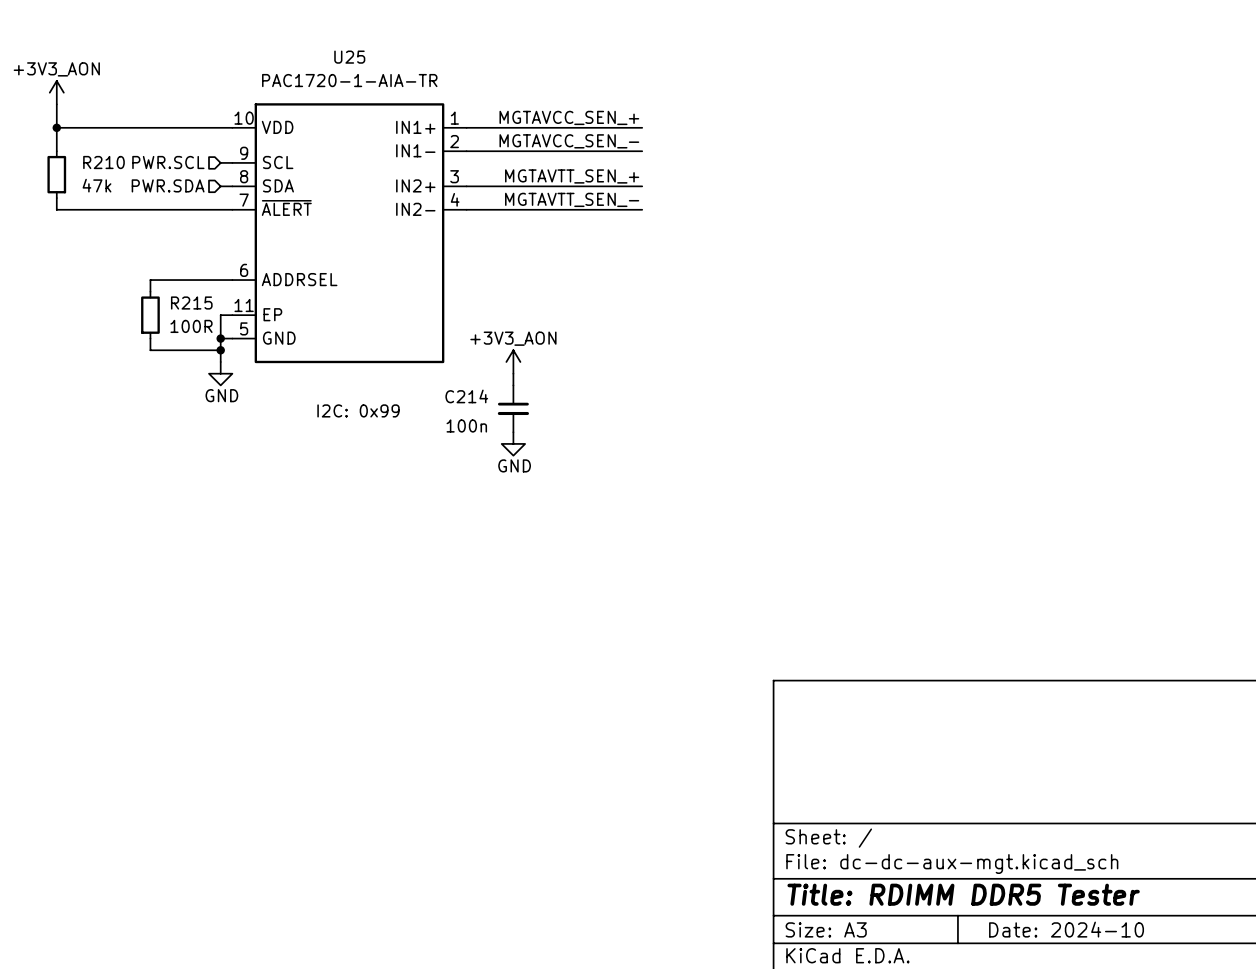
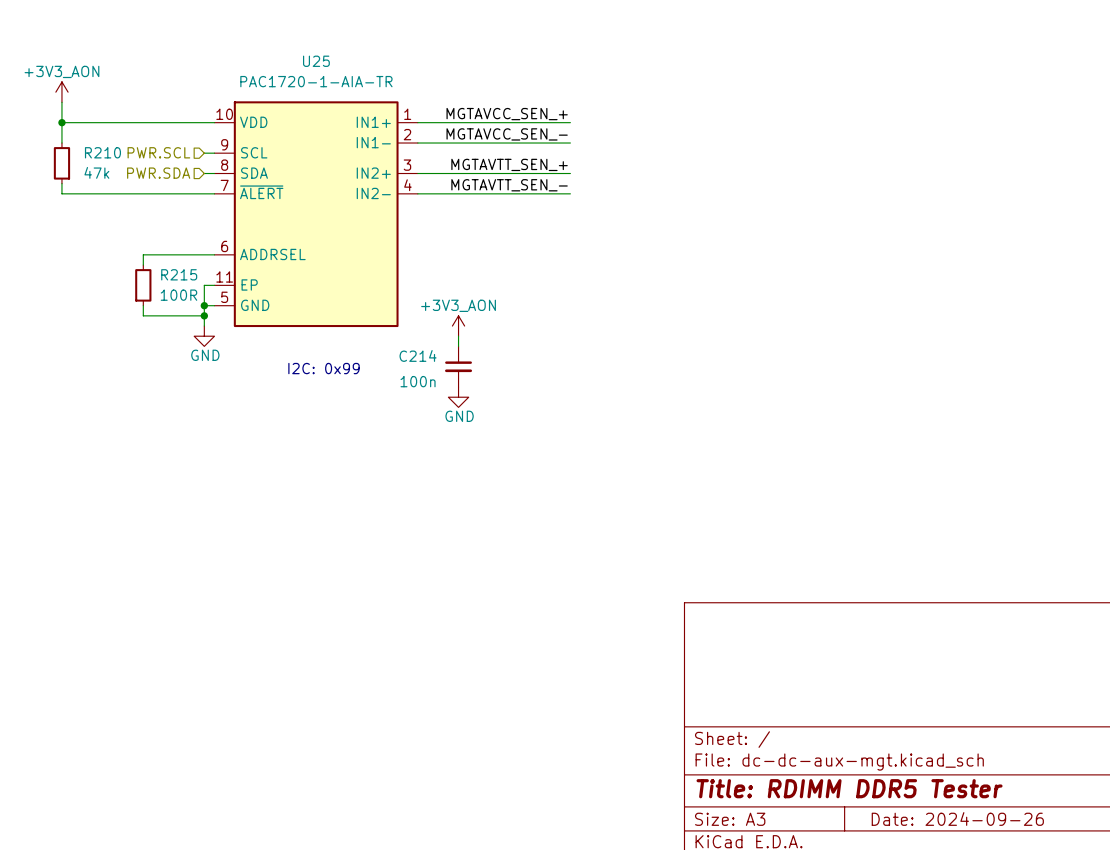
title block: Date: 2024-10 (1066, 929) -> Date: 2024-09-26 (957, 818)

